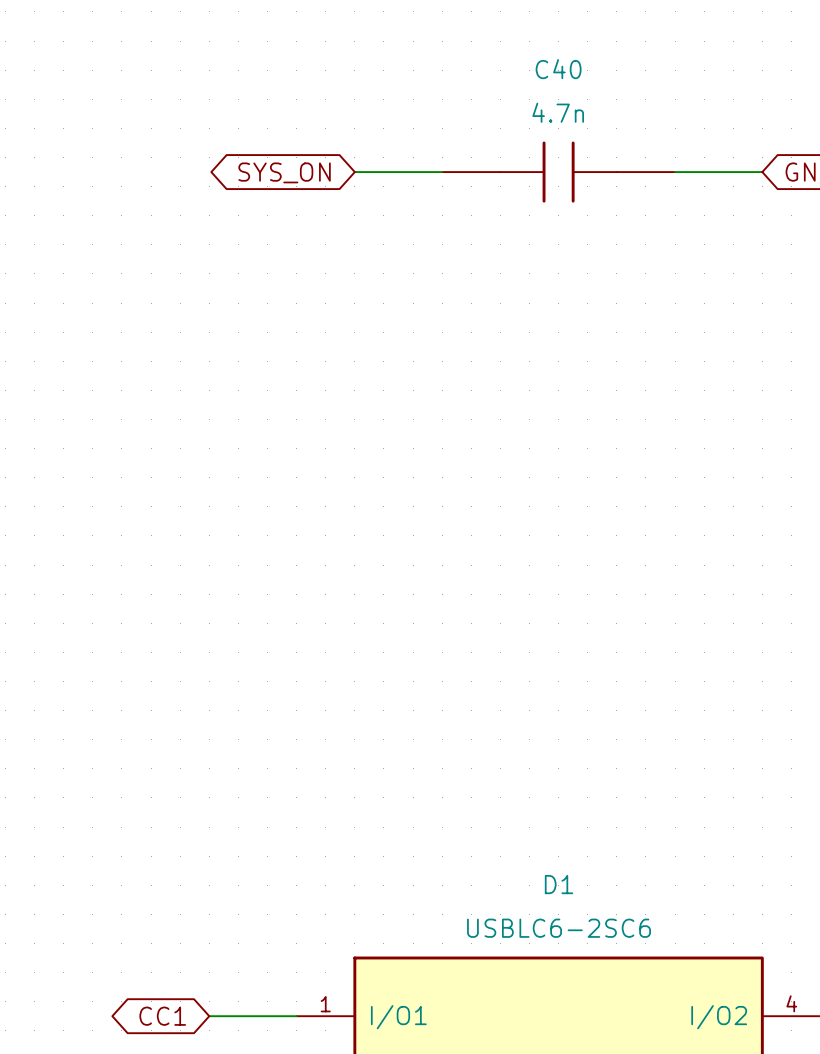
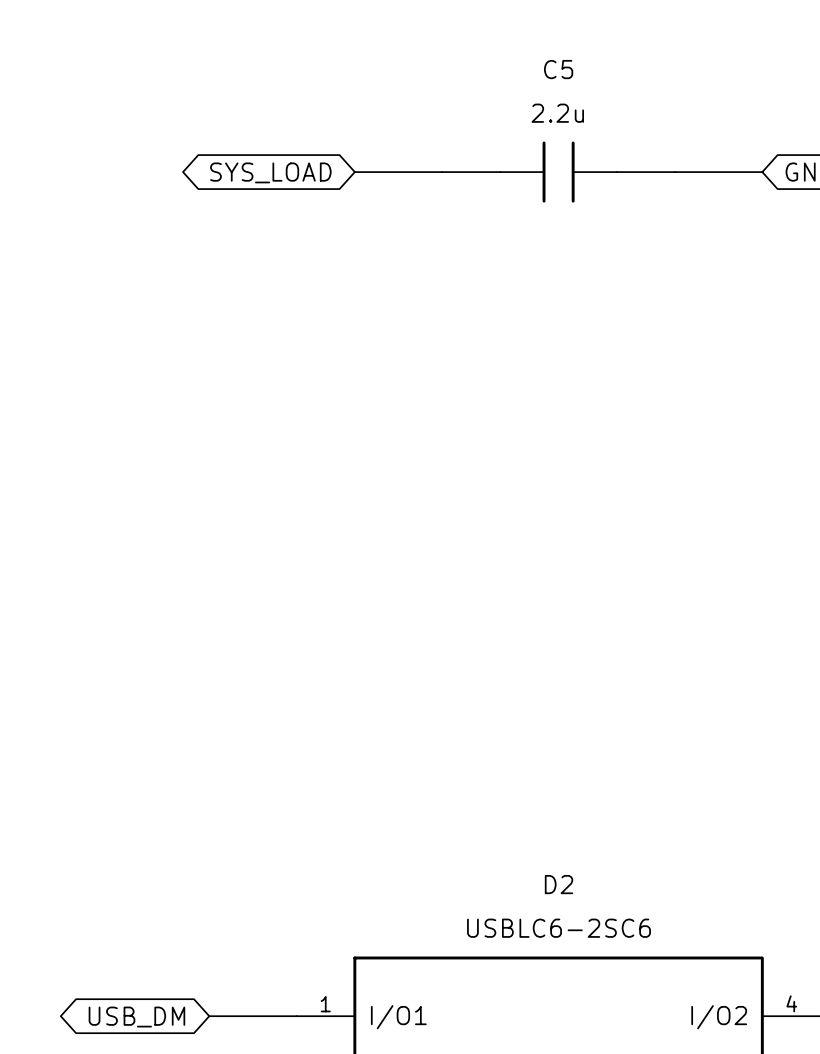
C40 name: C40 (558, 69) -> C5 (558, 69)
C40 value: 4.7n (558, 112) -> 2.2u (557, 113)
global label: SYS_ON (284, 172) -> SYS_LOAD (270, 172)
D1 name: D1 (559, 884) -> D2 (559, 884)
global label: CC1 (162, 1016) -> USB_DM (136, 1017)

